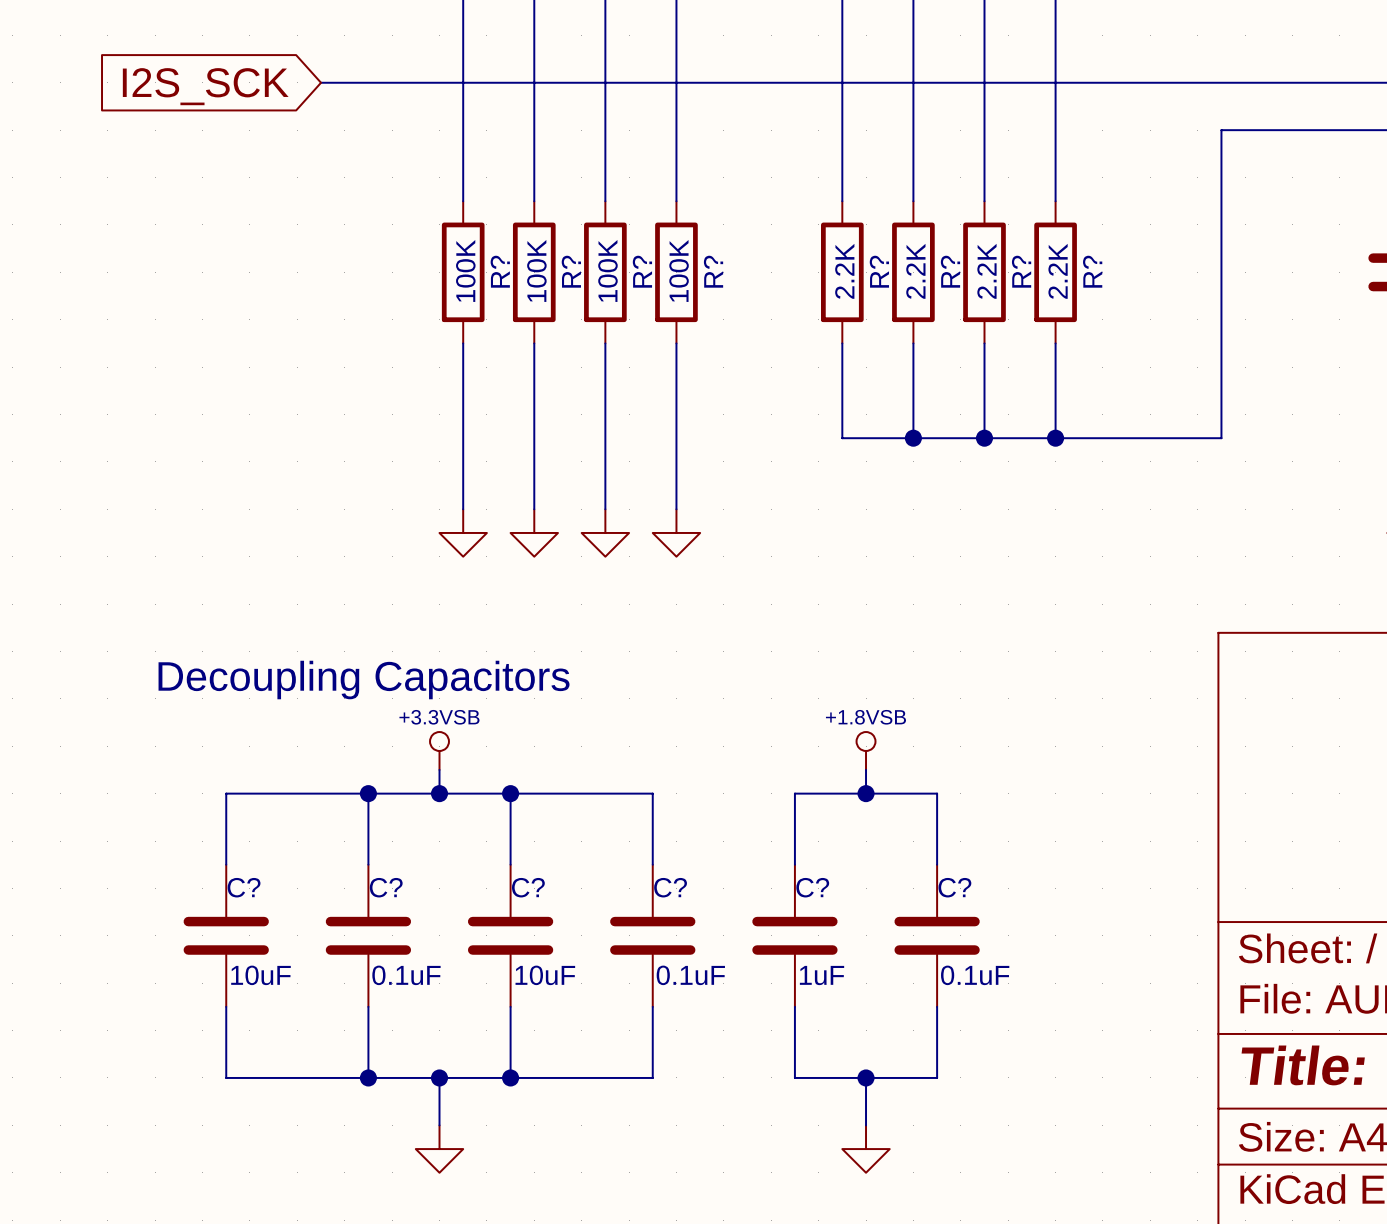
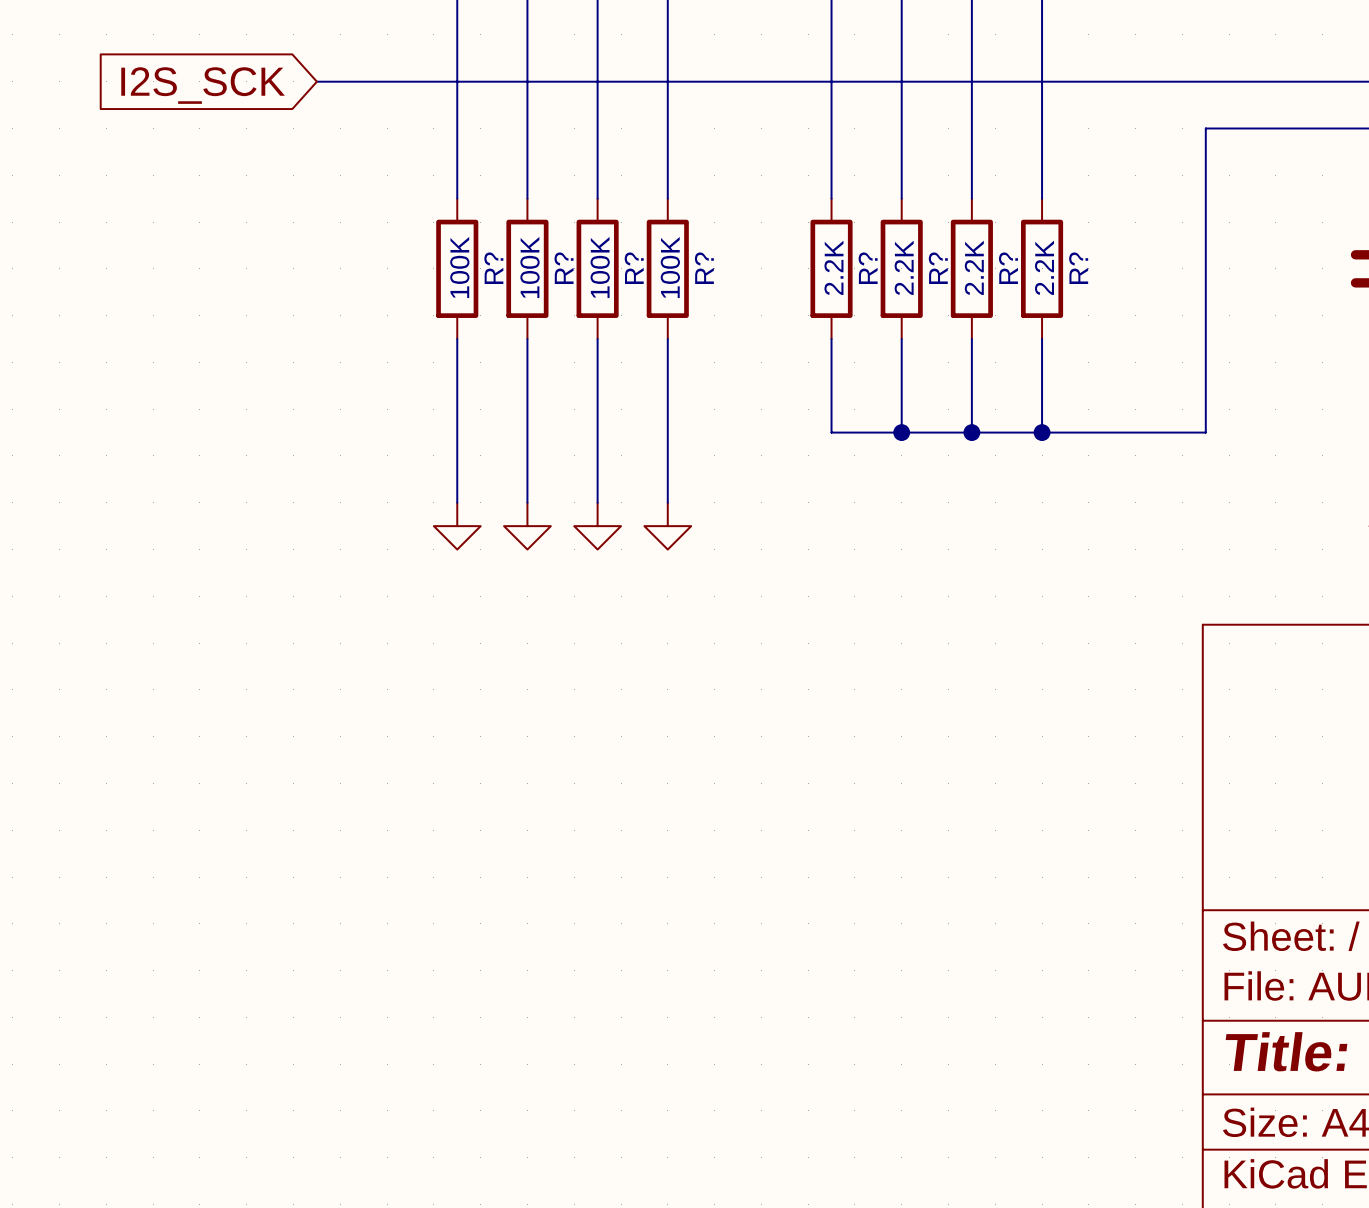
text: Decoupling Capacitors (364, 680) -> none
power symbol: +3.3VSB (439, 750) -> none
power symbol: +1.8VSB (866, 750) -> none
wire: (439, 769) (439, 793) -> none
wire: (866, 769) (866, 793) -> none
wire: (368, 793) (368, 864) -> none
junction: (368, 793) -> none
junction: (439, 793) -> none
wire: (510, 793) (510, 864) -> none
junction: (510, 793) -> none
junction: (866, 793) -> none
wire: (226, 864) (226, 793) (652, 793) (652, 864) -> none
wire: (794, 864) (794, 793) (937, 793) (937, 864) -> none
C?: 10uF (226, 935) -> none
C?: 0.1uF (368, 935) -> none
C?: 10uF (510, 935) -> none
C?: 0.1uF (652, 935) -> none
C?: 1uF (794, 935) -> none
C?: 0.1uF (937, 935) -> none
wire: (226, 1006) (226, 1077) (652, 1077) (652, 1006) -> none
wire: (368, 1006) (368, 1077) -> none
wire: (510, 1006) (510, 1077) -> none
wire: (794, 1006) (794, 1077) (937, 1077) (937, 1006) -> none
junction: (368, 1077) -> none
wire: (439, 1077) (439, 1125) -> none
junction: (439, 1077) -> none
junction: (510, 1077) -> none
wire: (866, 1077) (866, 1125) -> none
junction: (866, 1077) -> none
power symbol: (439, 1149) -> none
power symbol: (866, 1149) -> none

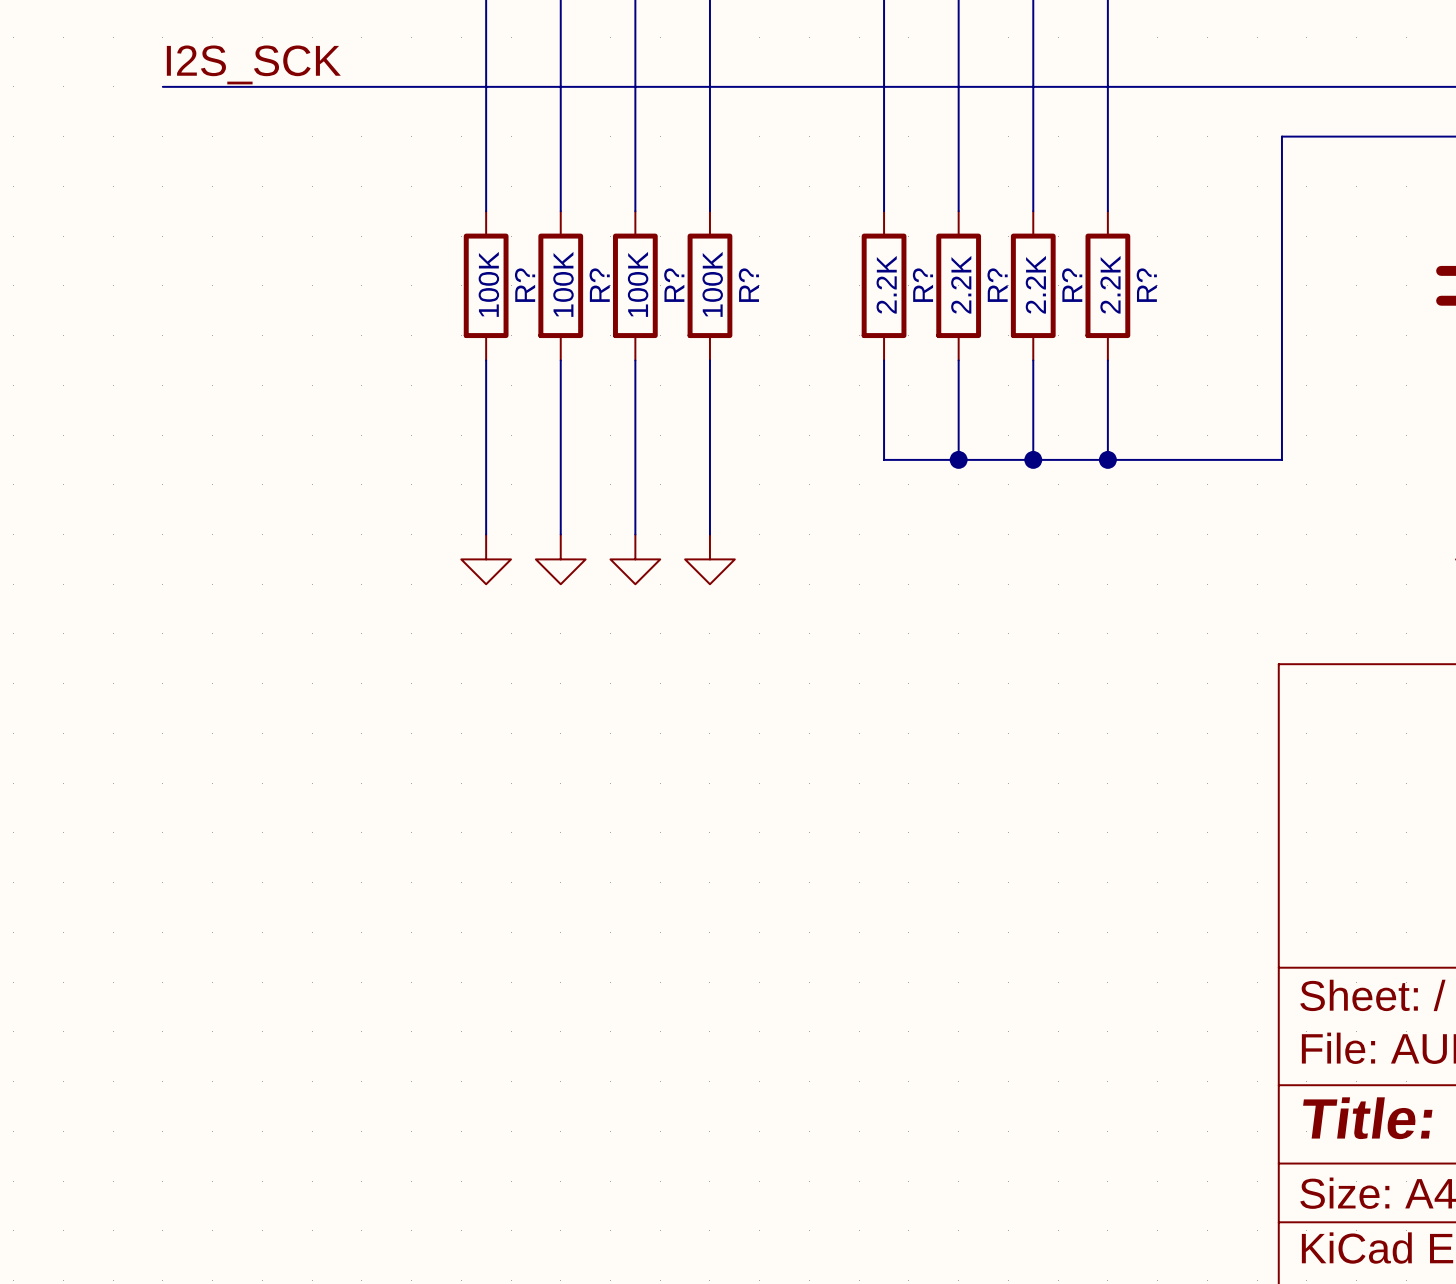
label: none -> I2S_SCK (253, 64)
wire: none -> (162, 86) (336, 86)
global label: I2S_SCK (203, 85) -> none

